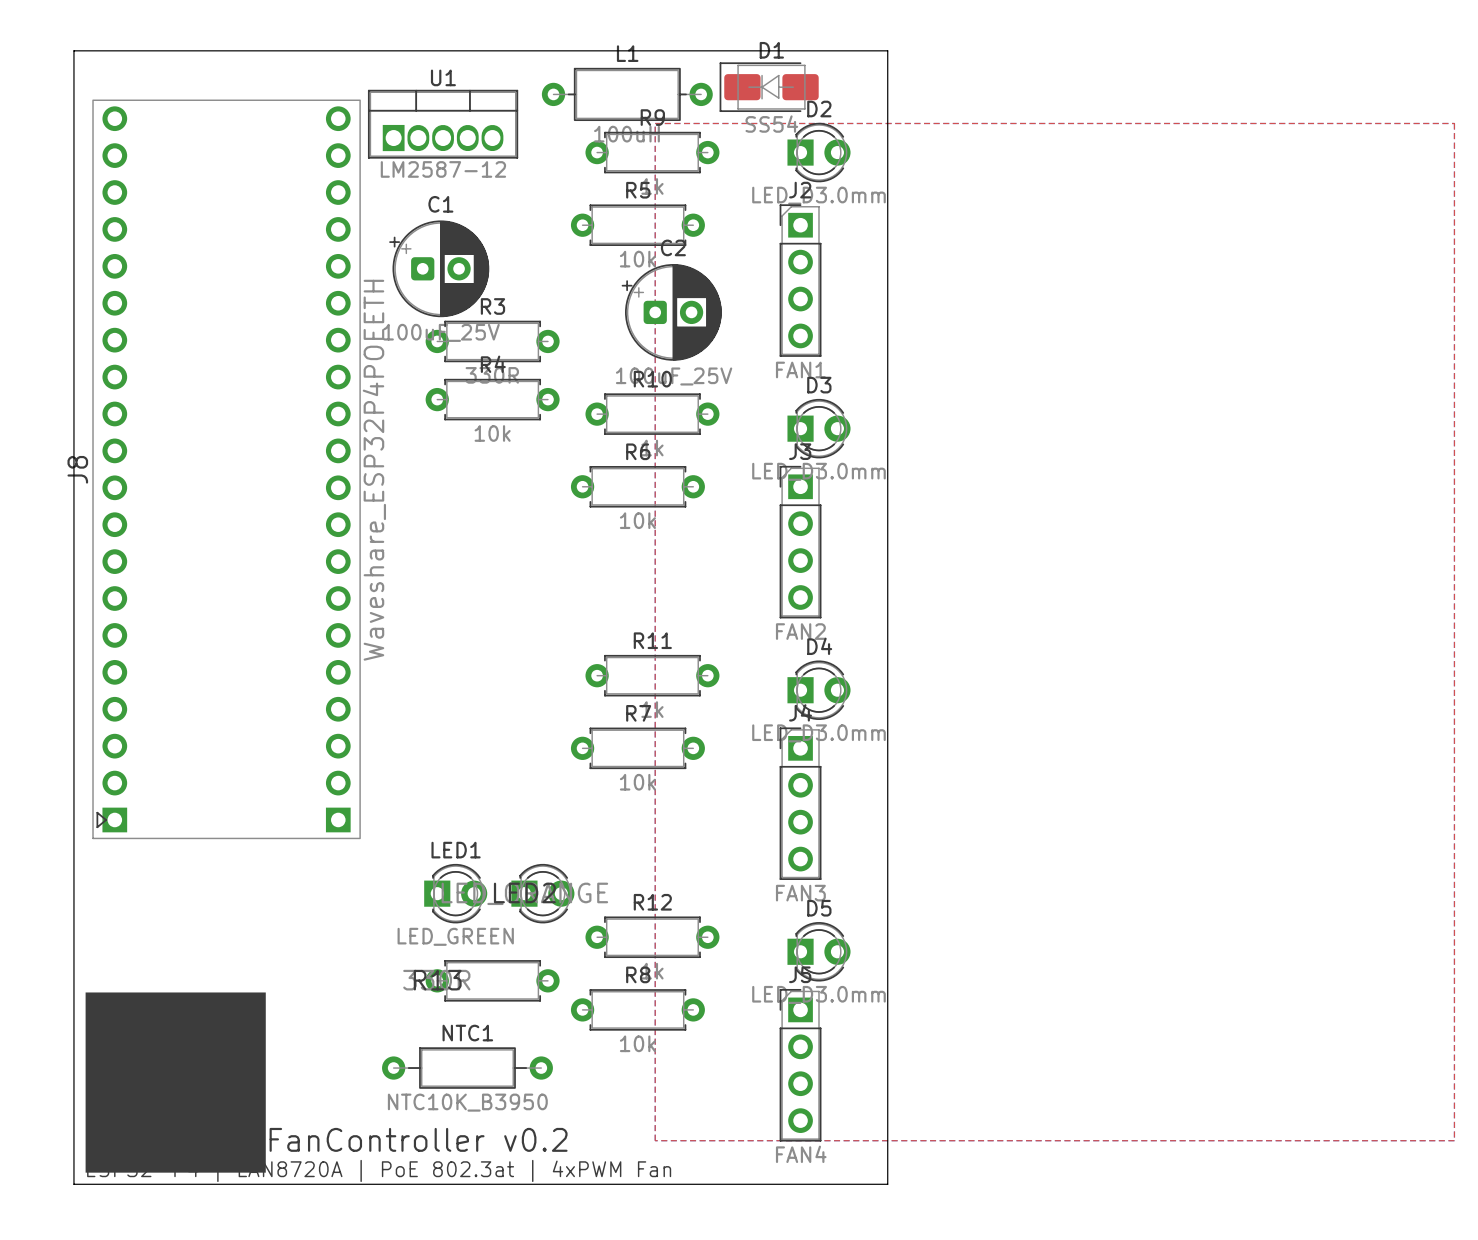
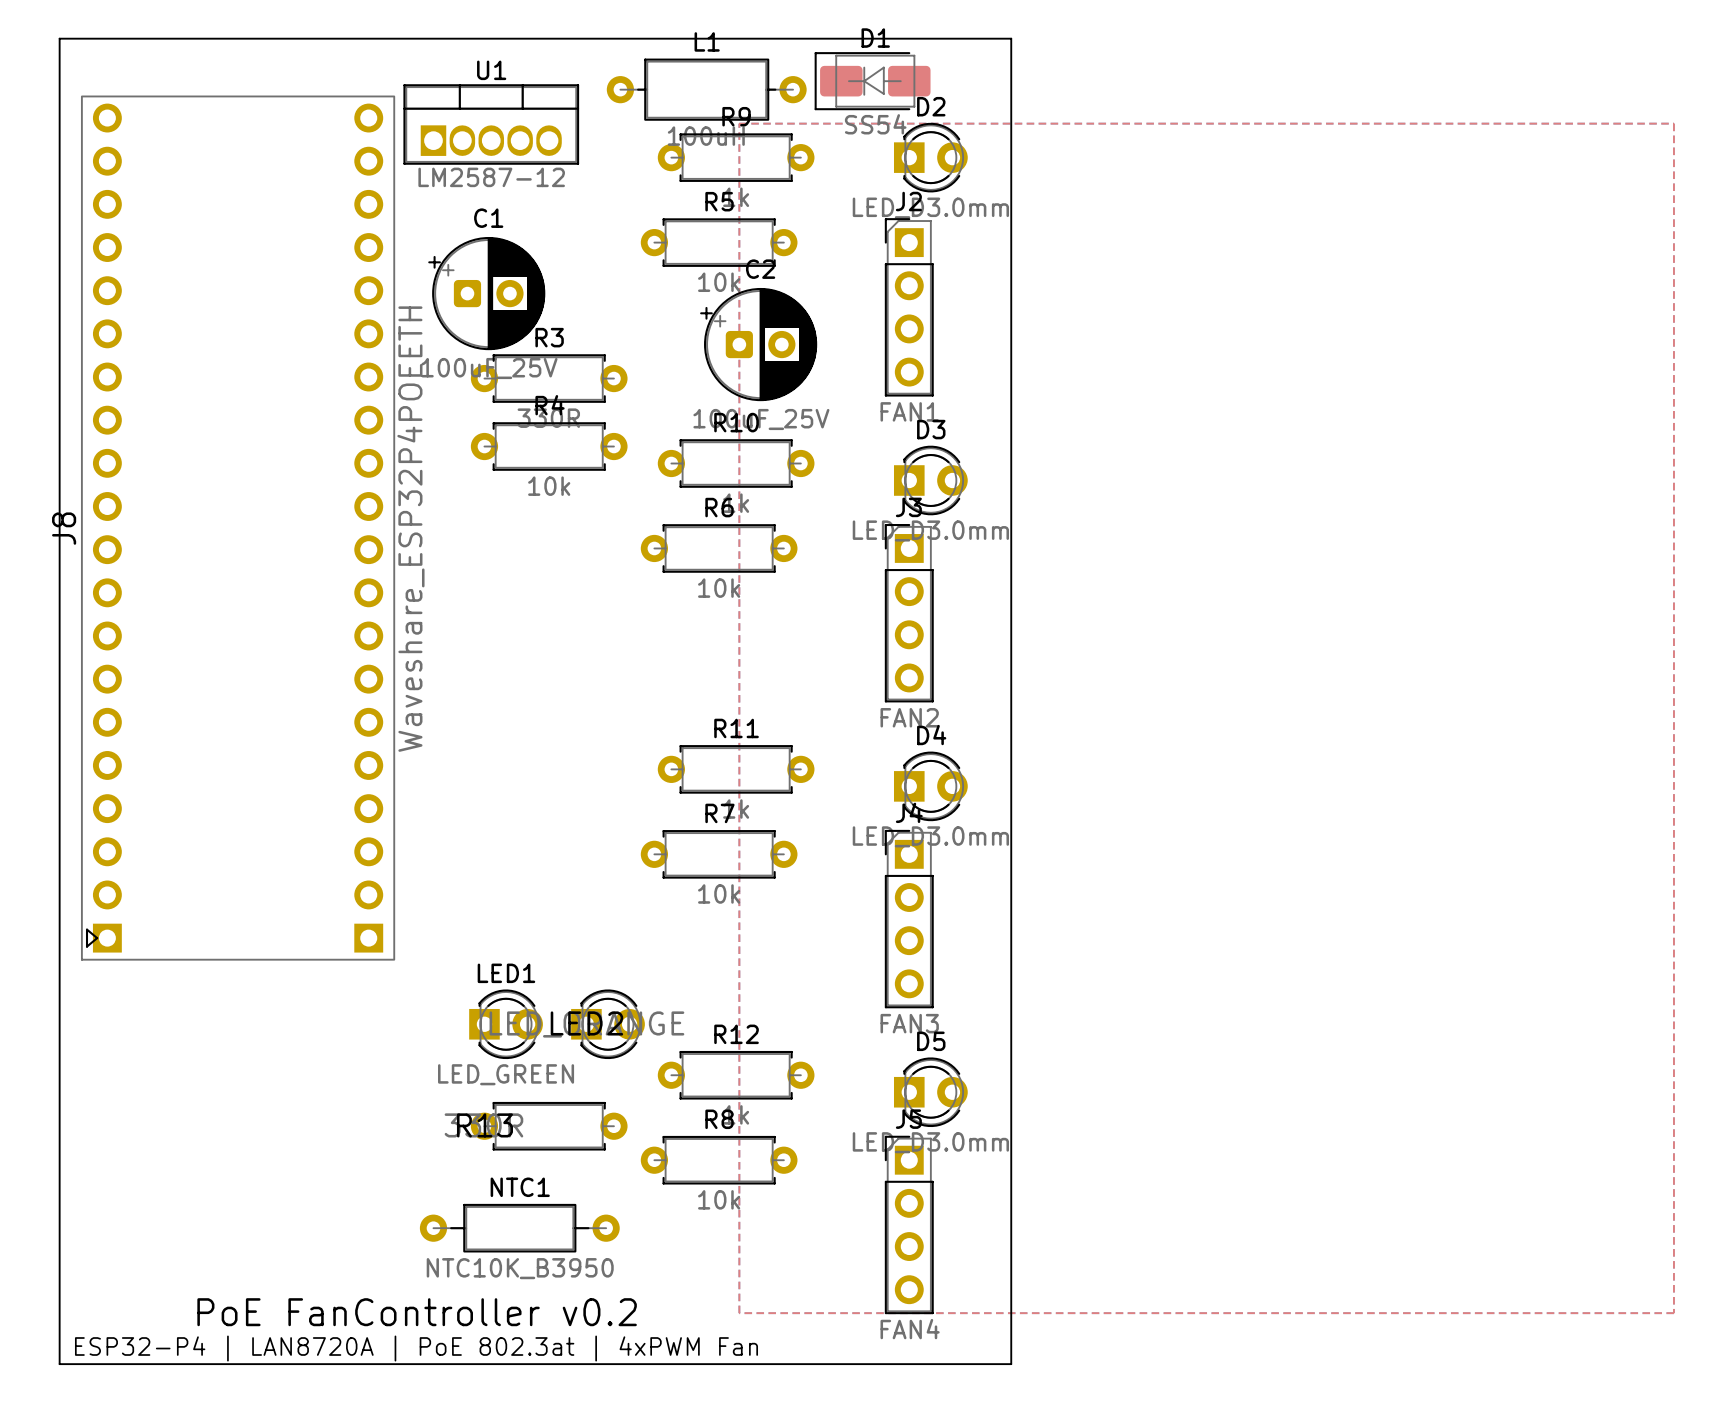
drawing: [85, 992, 266, 1173] -> none

